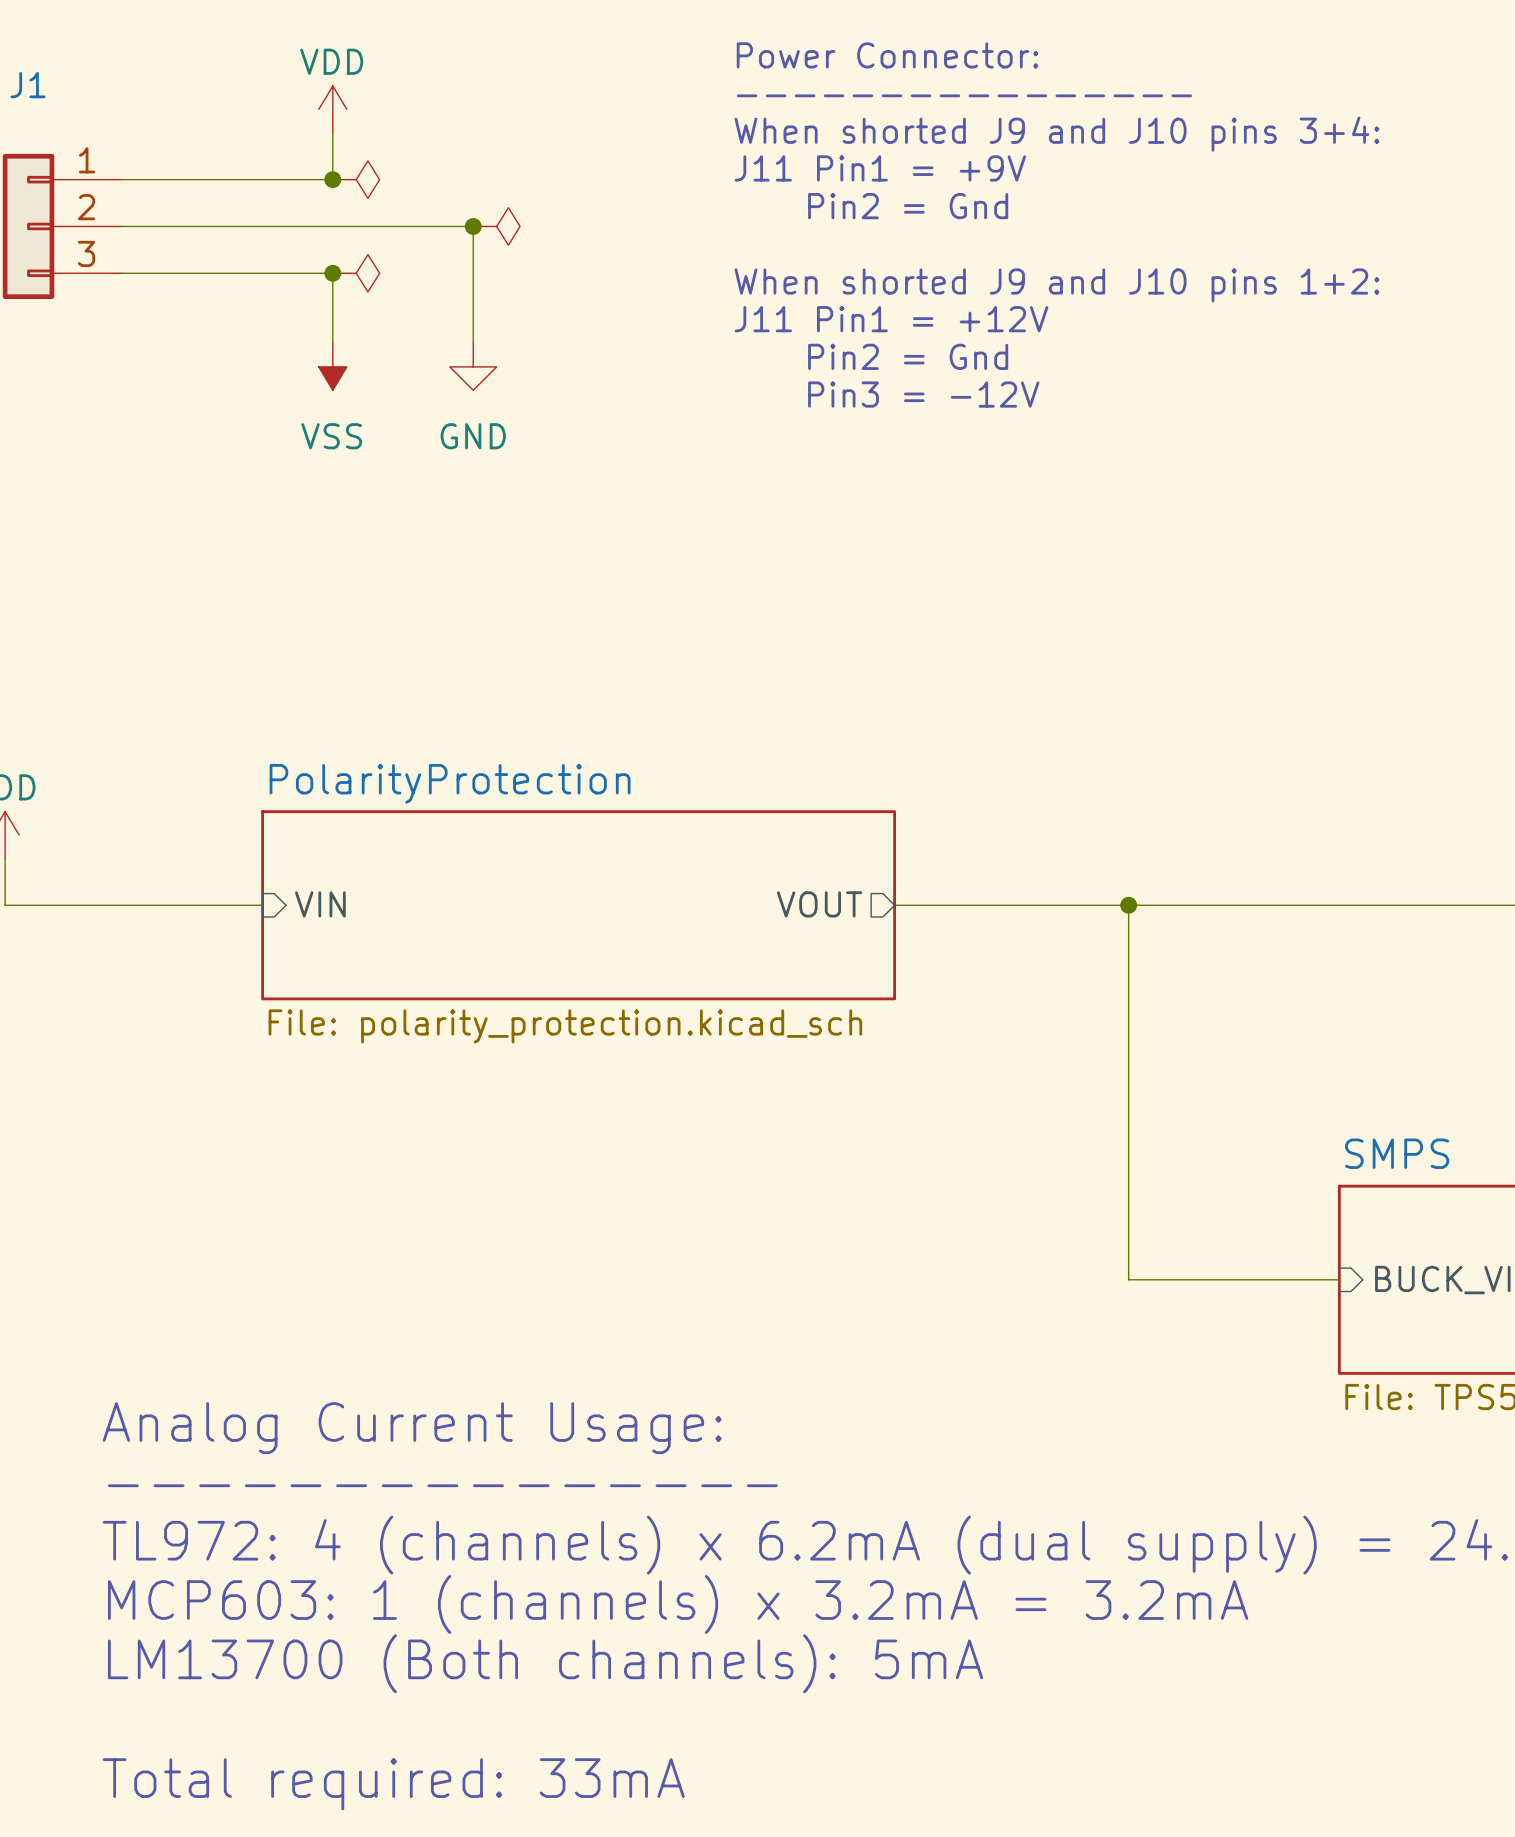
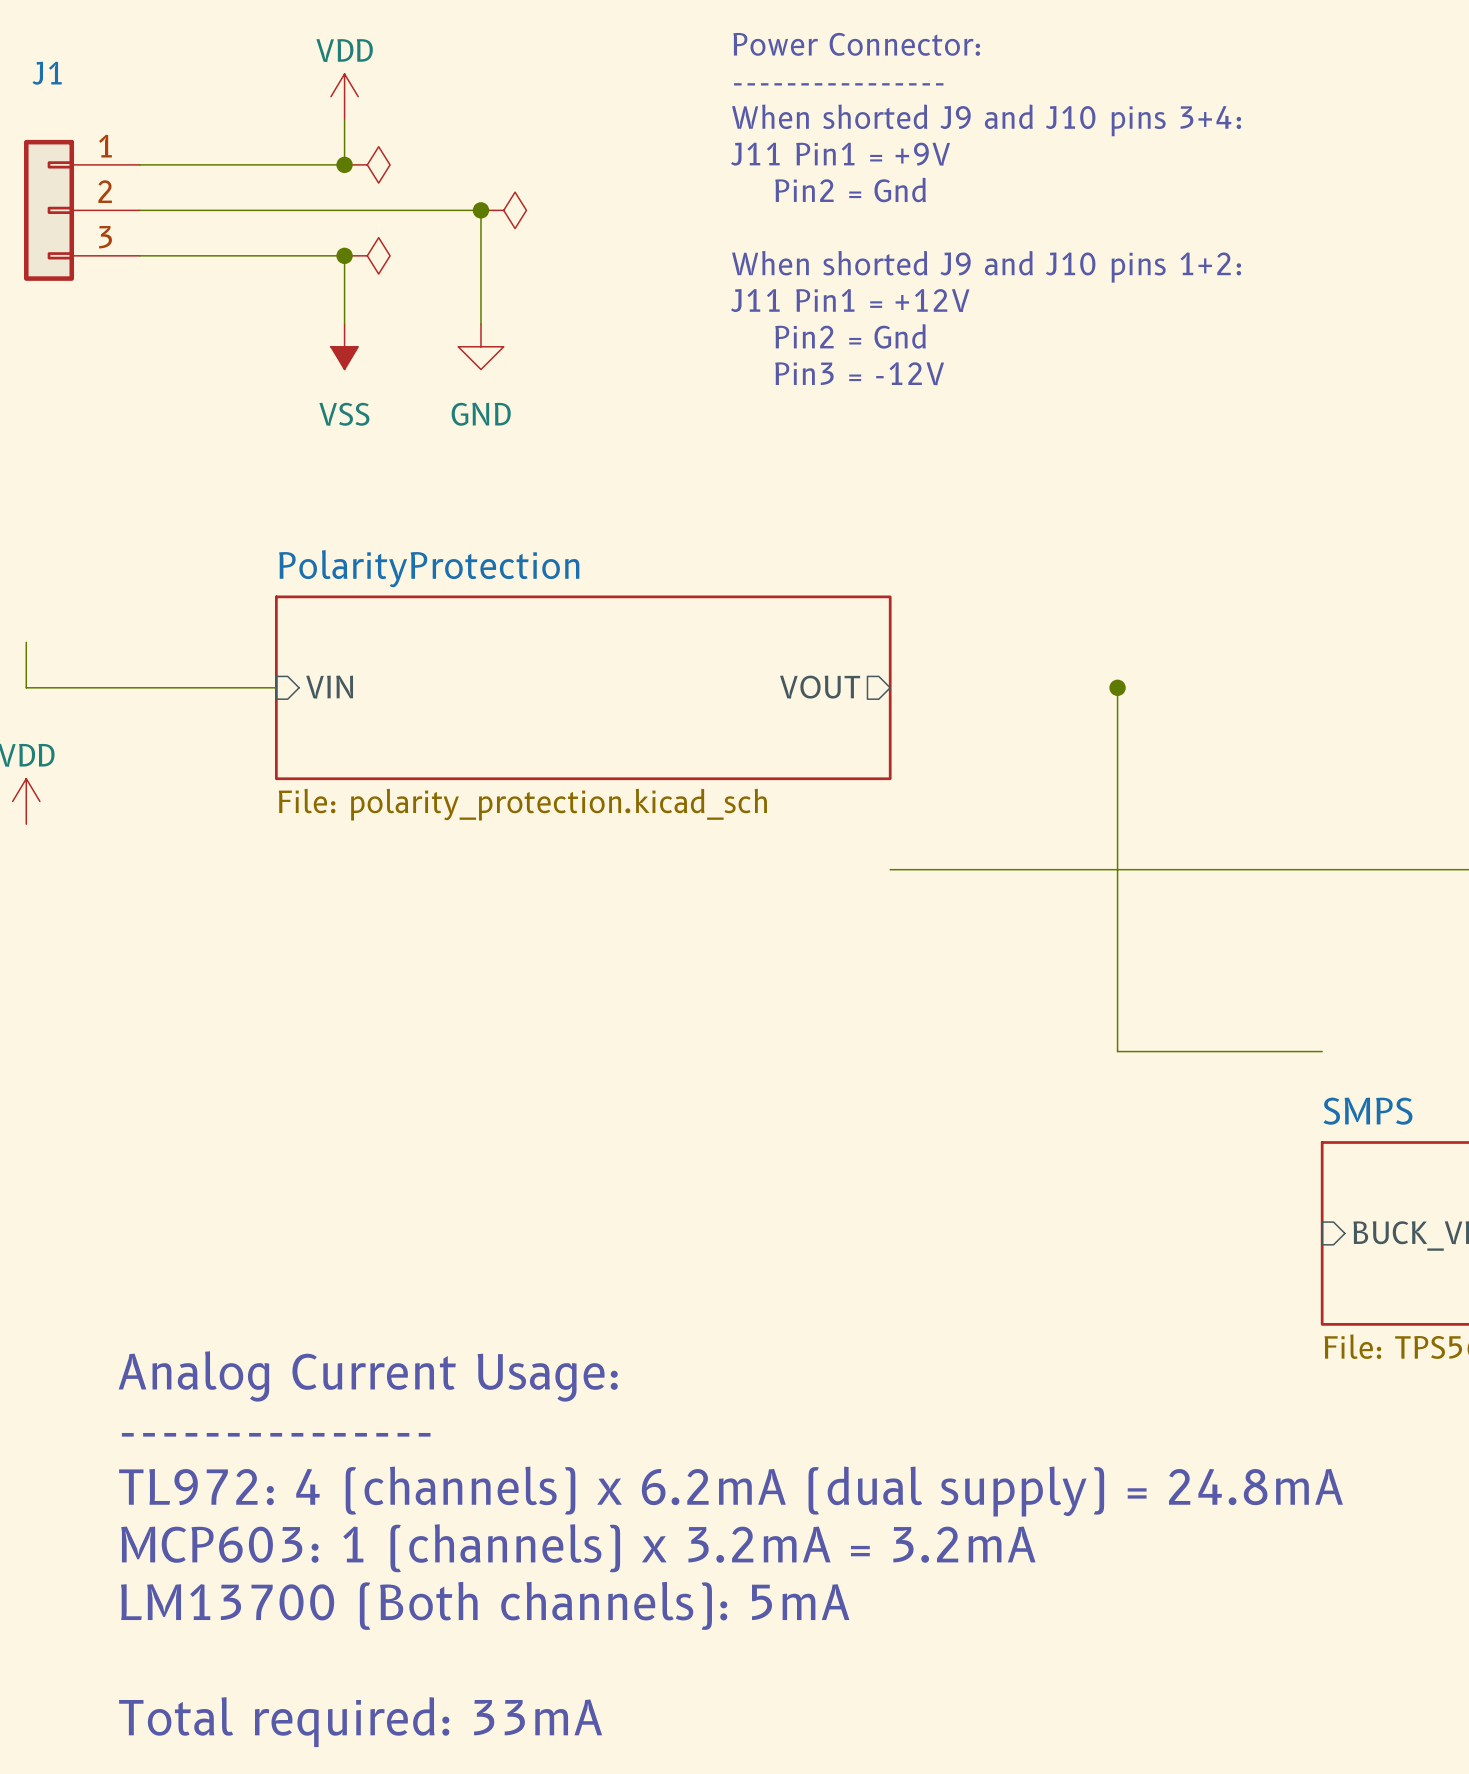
wire: none -> (1117, 687) (1117, 869)
junction: none -> (1117, 687)
wire: (5, 858) (5, 905) (262, 905) -> (26, 642) (26, 687) (276, 687)
sheet pin position: VIN (320, 904) -> VIN (329, 687)
sheet pin position: VOUT (819, 904) -> VOUT (820, 687)
sheet PolarityProtection position: (578, 905) -> (583, 687)
junction: (1128, 905) -> none
wire: (1128, 1092) (1128, 1279) (1339, 1279) -> (1117, 1051) (1322, 1051)

